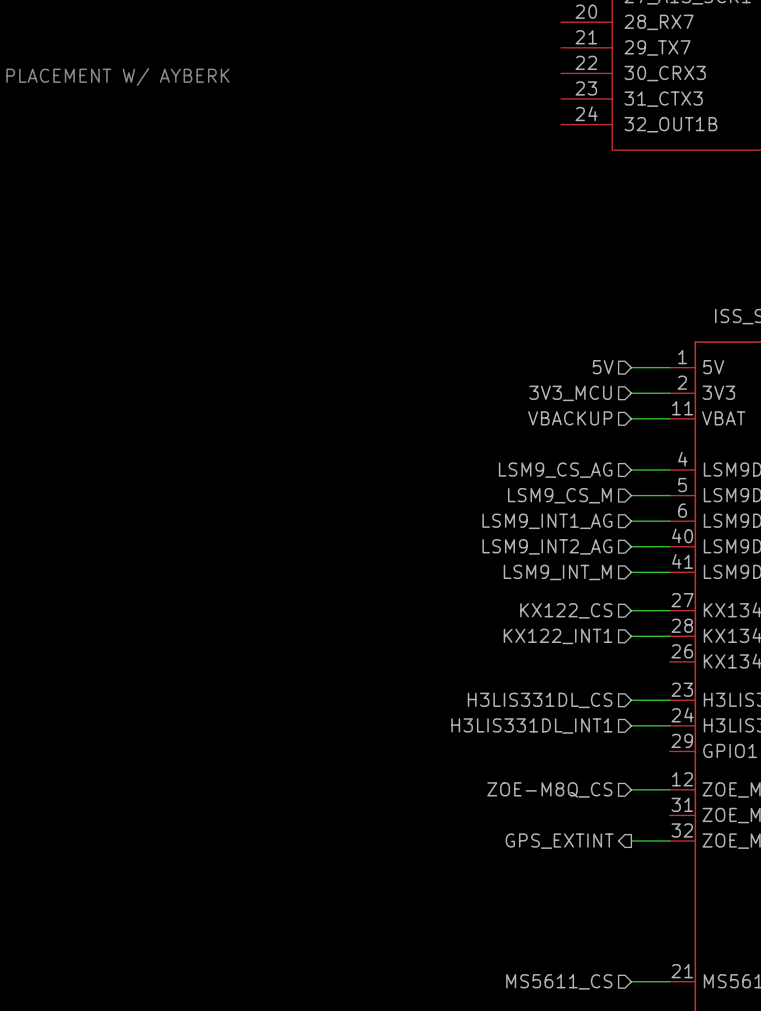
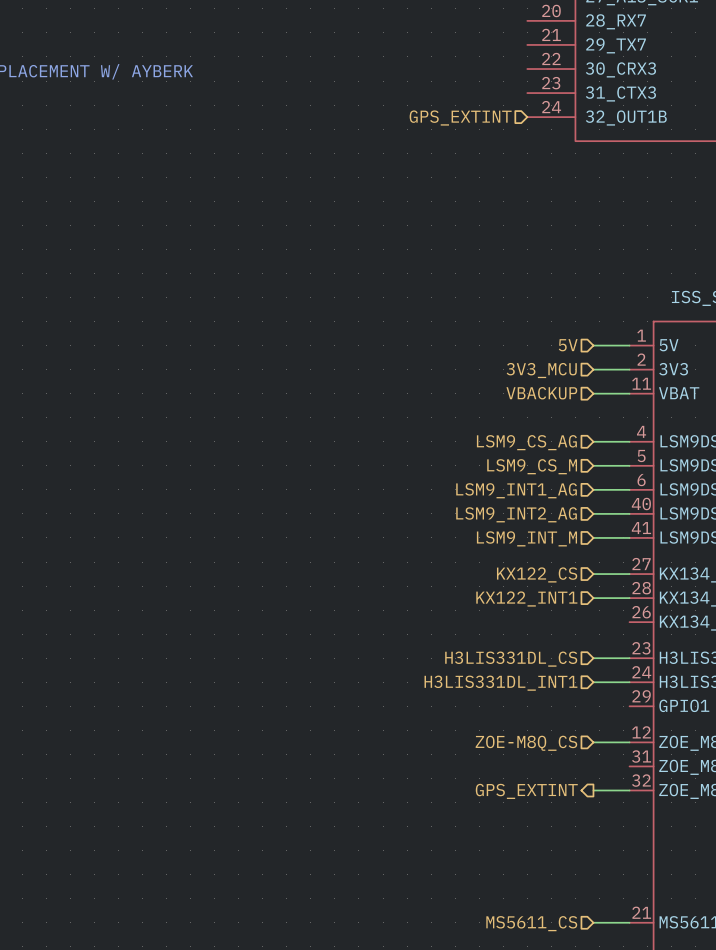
hierarchical label: none -> GPS_EXTINT (460, 118)

